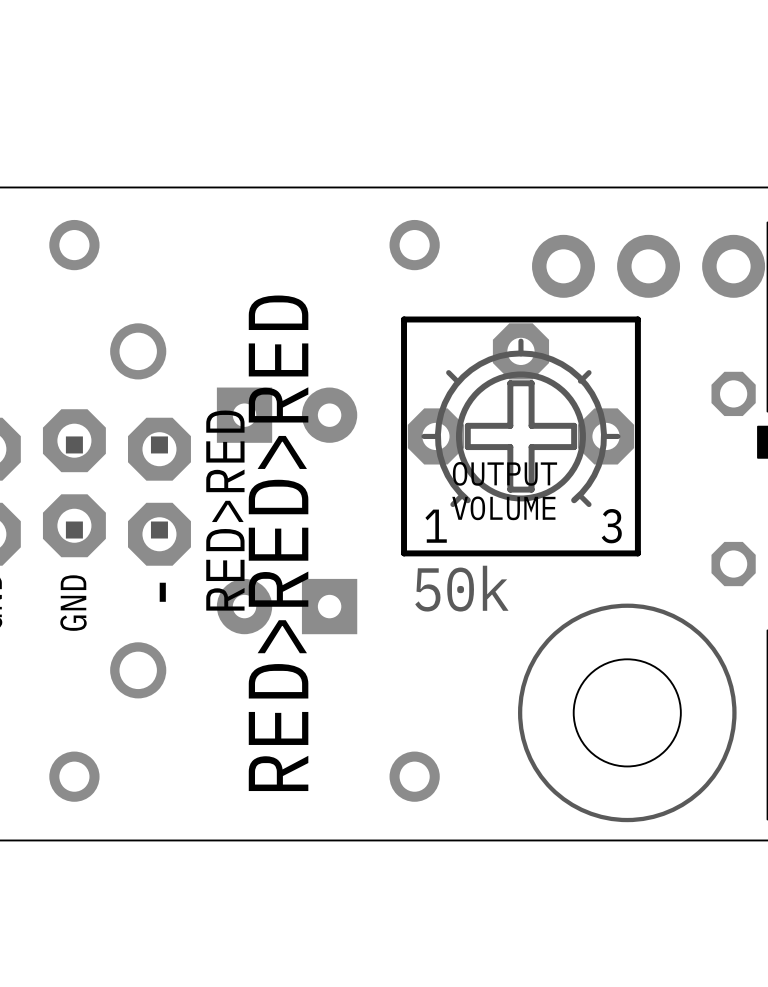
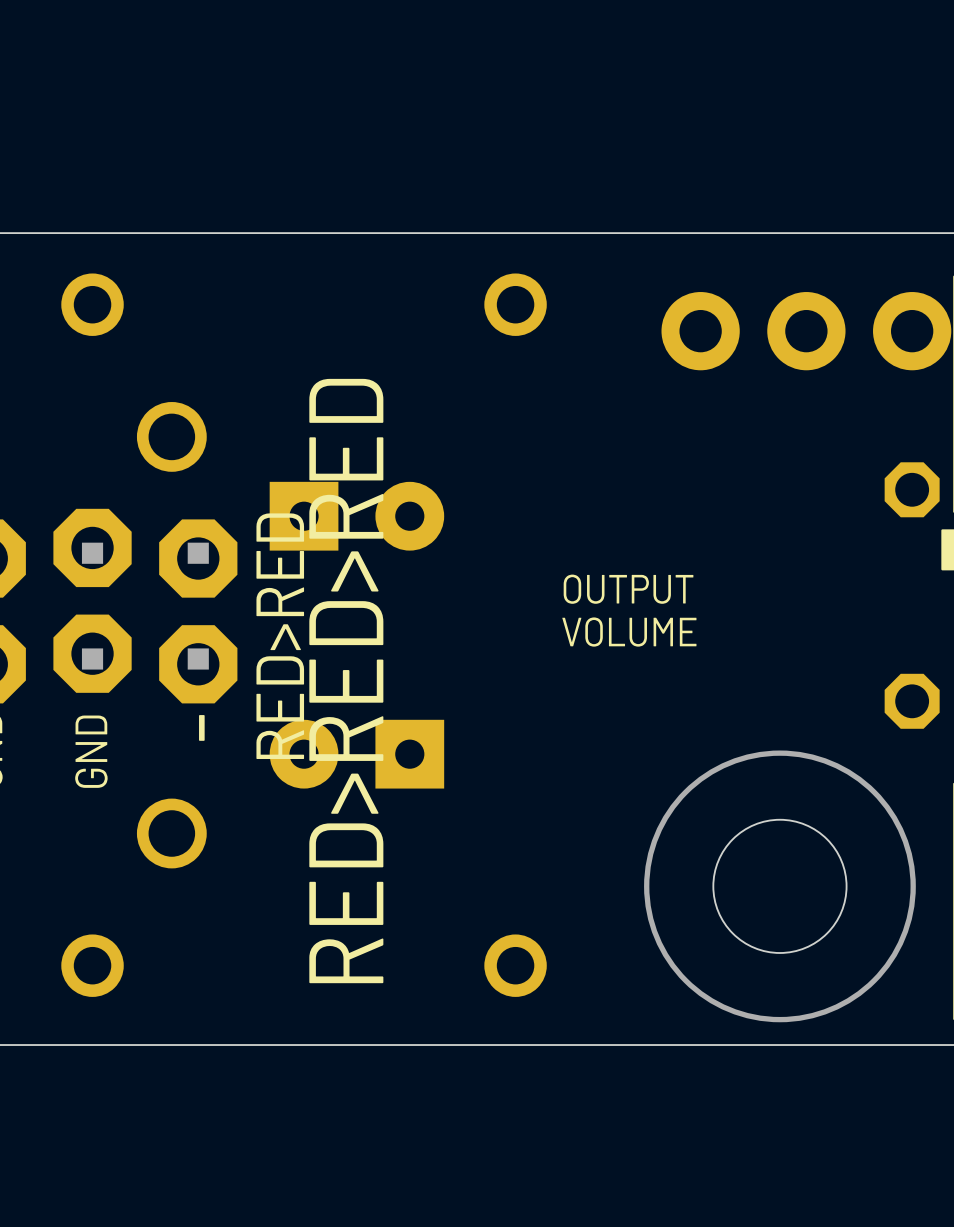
part: 50k (520, 436) -> none

